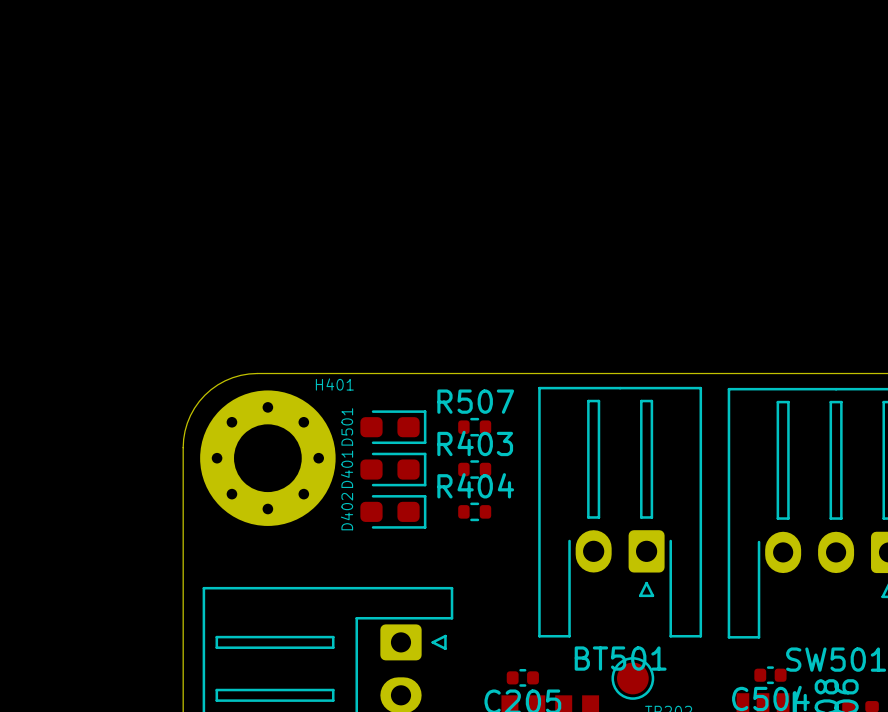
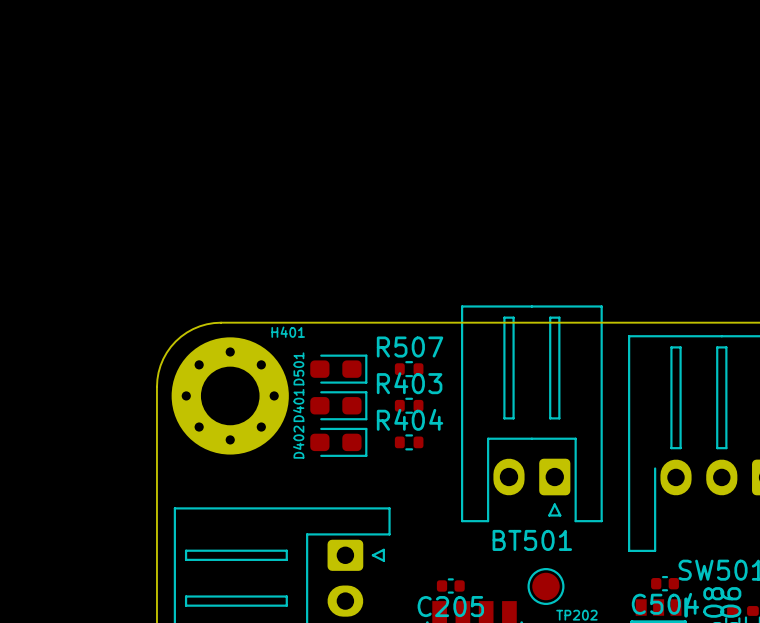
BT501 footprint: [538, 386, 703, 638] -> [461, 305, 603, 523]

